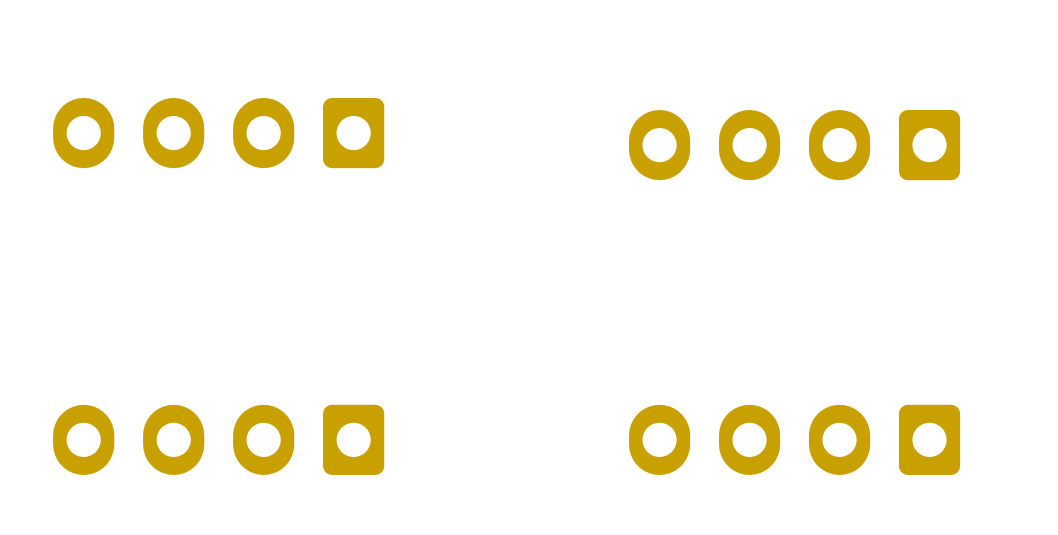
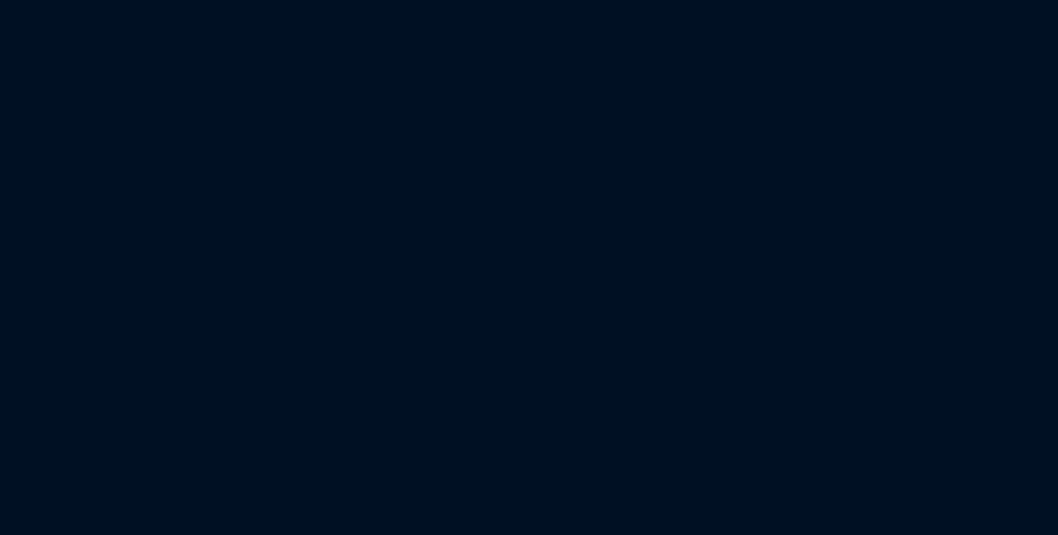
part: (218, 133) -> none
part: (794, 145) -> none
part: (218, 439) -> none
part: (794, 439) -> none

